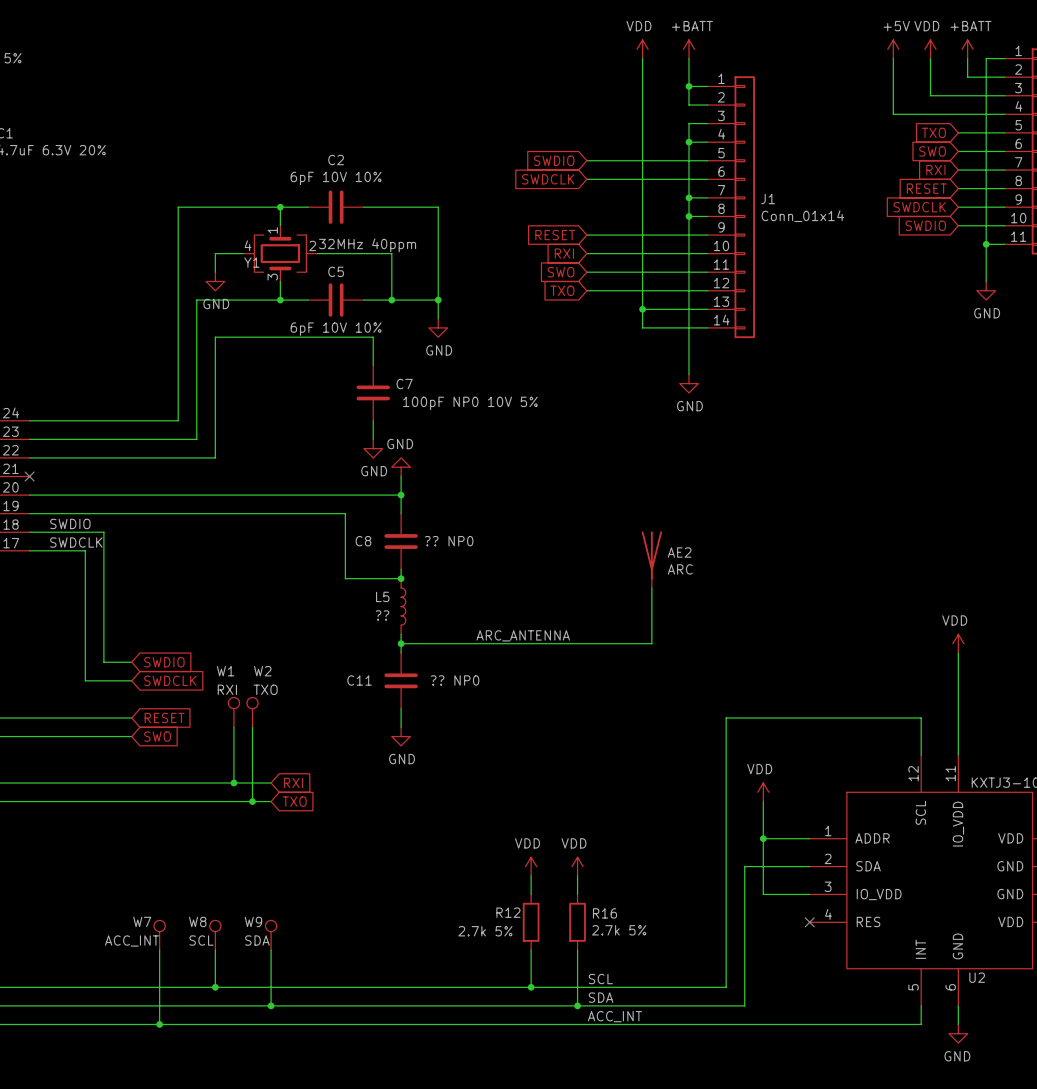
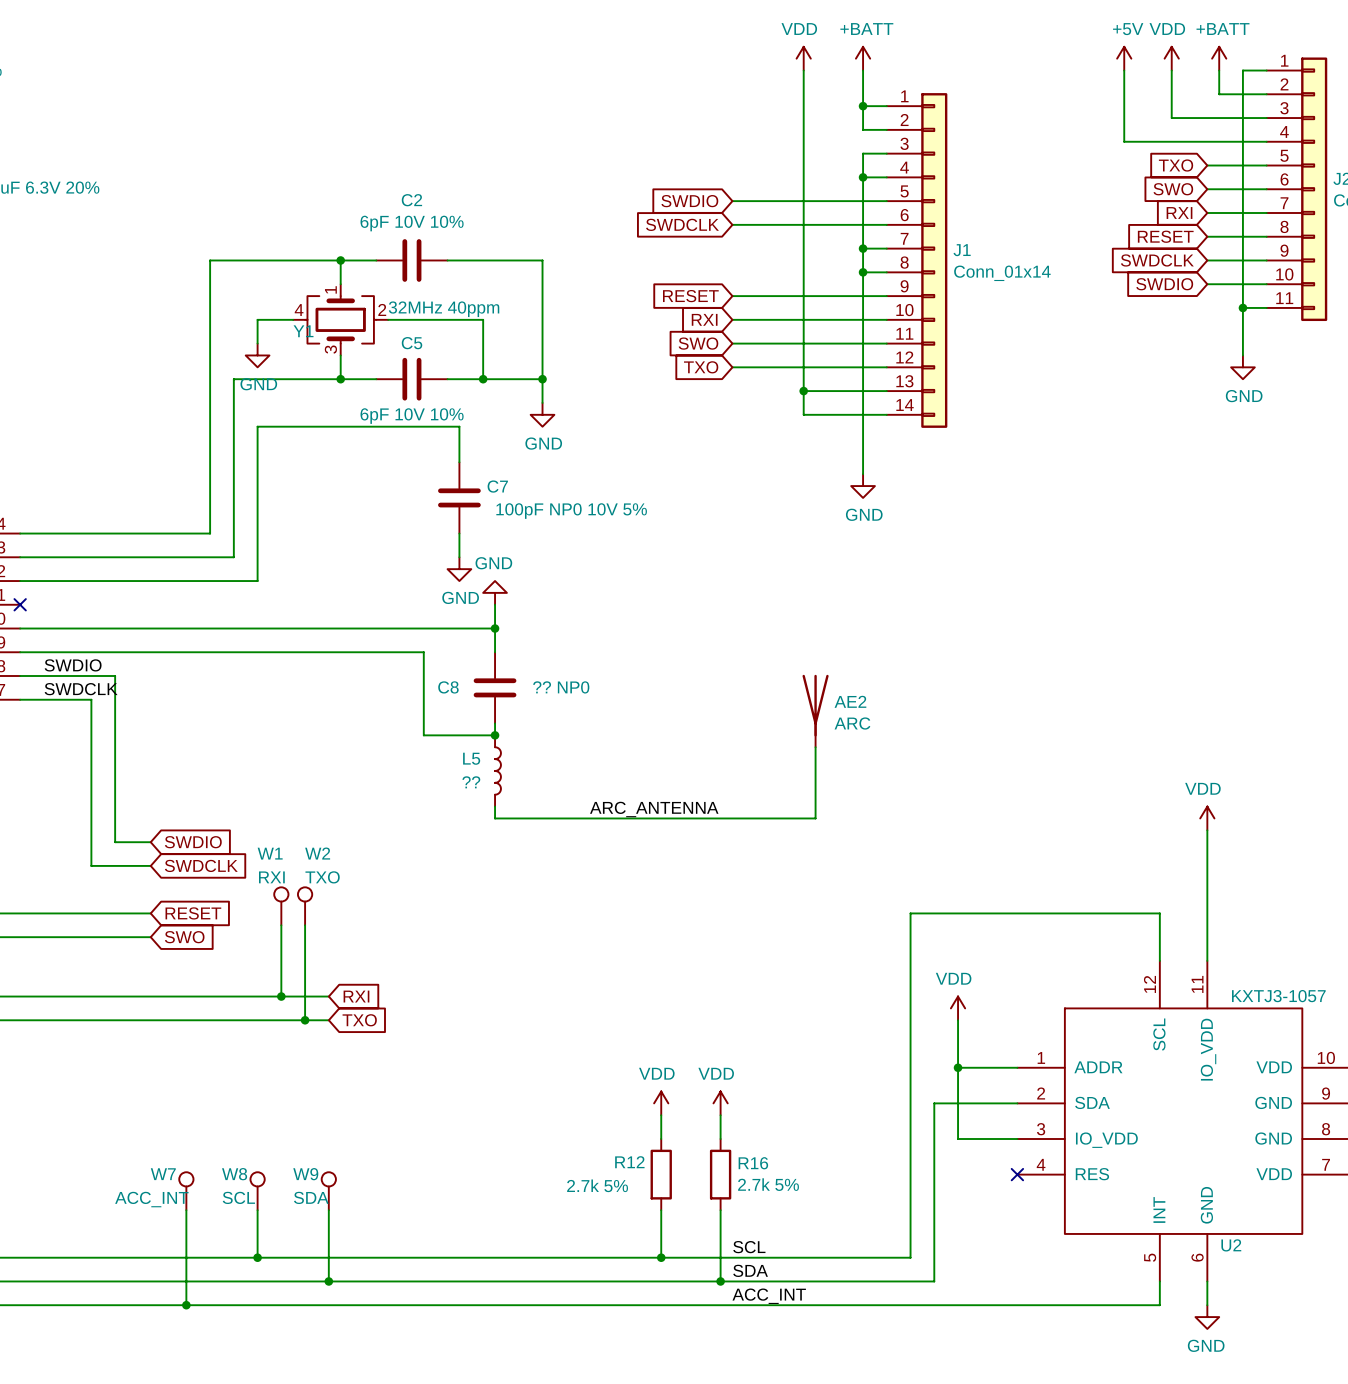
wire: (401, 643) (401, 652) -> none
junction: (401, 643) -> none
C11: ?? NP0 (401, 680) -> none
wire: (401, 708) (401, 727) -> none
power symbol: GND (401, 736) -> none

